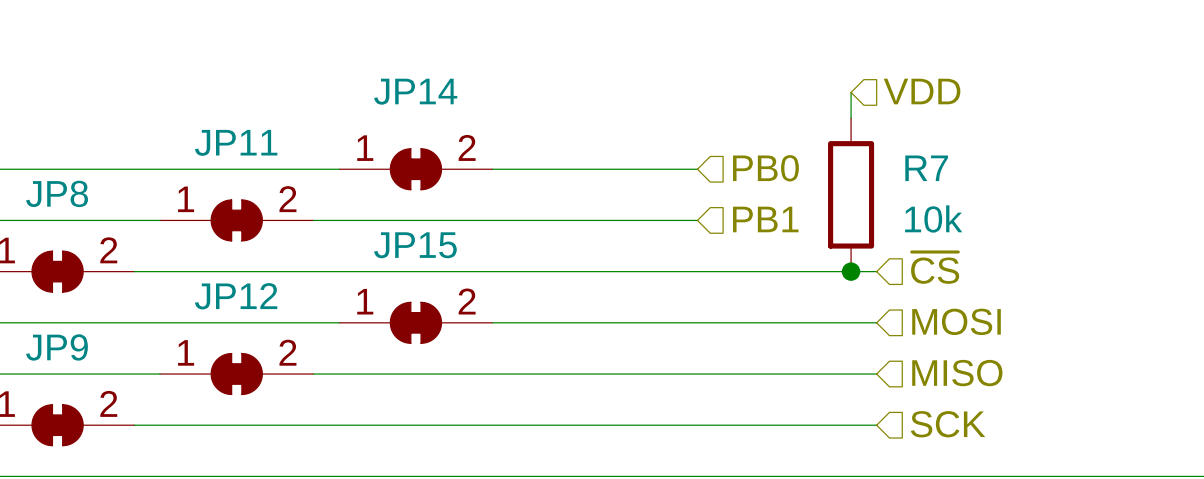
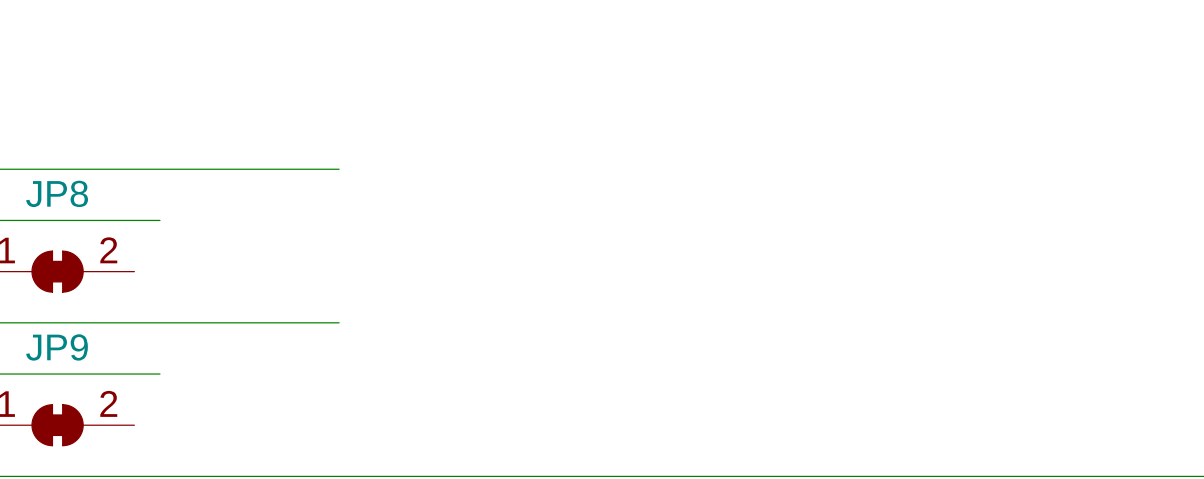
hierarchical label: VDD (922, 91) -> none
wire: (851, 92) (851, 118) -> none
hierarchical label: PB0 (765, 168) -> none
JP14: (415, 169) -> none
wire: (492, 169) (697, 169) -> none
R7: 10k (851, 194) -> none
hierarchical label: PB1 (765, 219) -> none
JP11: (236, 220) -> none
wire: (313, 220) (697, 220) -> none
hierarchical label: ~{CS} (935, 267) -> none
wire: (134, 271) (876, 271) -> none
junction: (851, 271) -> none
hierarchical label: MOSI (956, 321) -> none
JP15: (415, 322) -> none
wire: (492, 322) (876, 322) -> none
hierarchical label: MISO (957, 373) -> none
JP12: (236, 374) -> none
wire: (313, 374) (876, 374) -> none
hierarchical label: SCK (948, 424) -> none
wire: (134, 425) (876, 425) -> none

